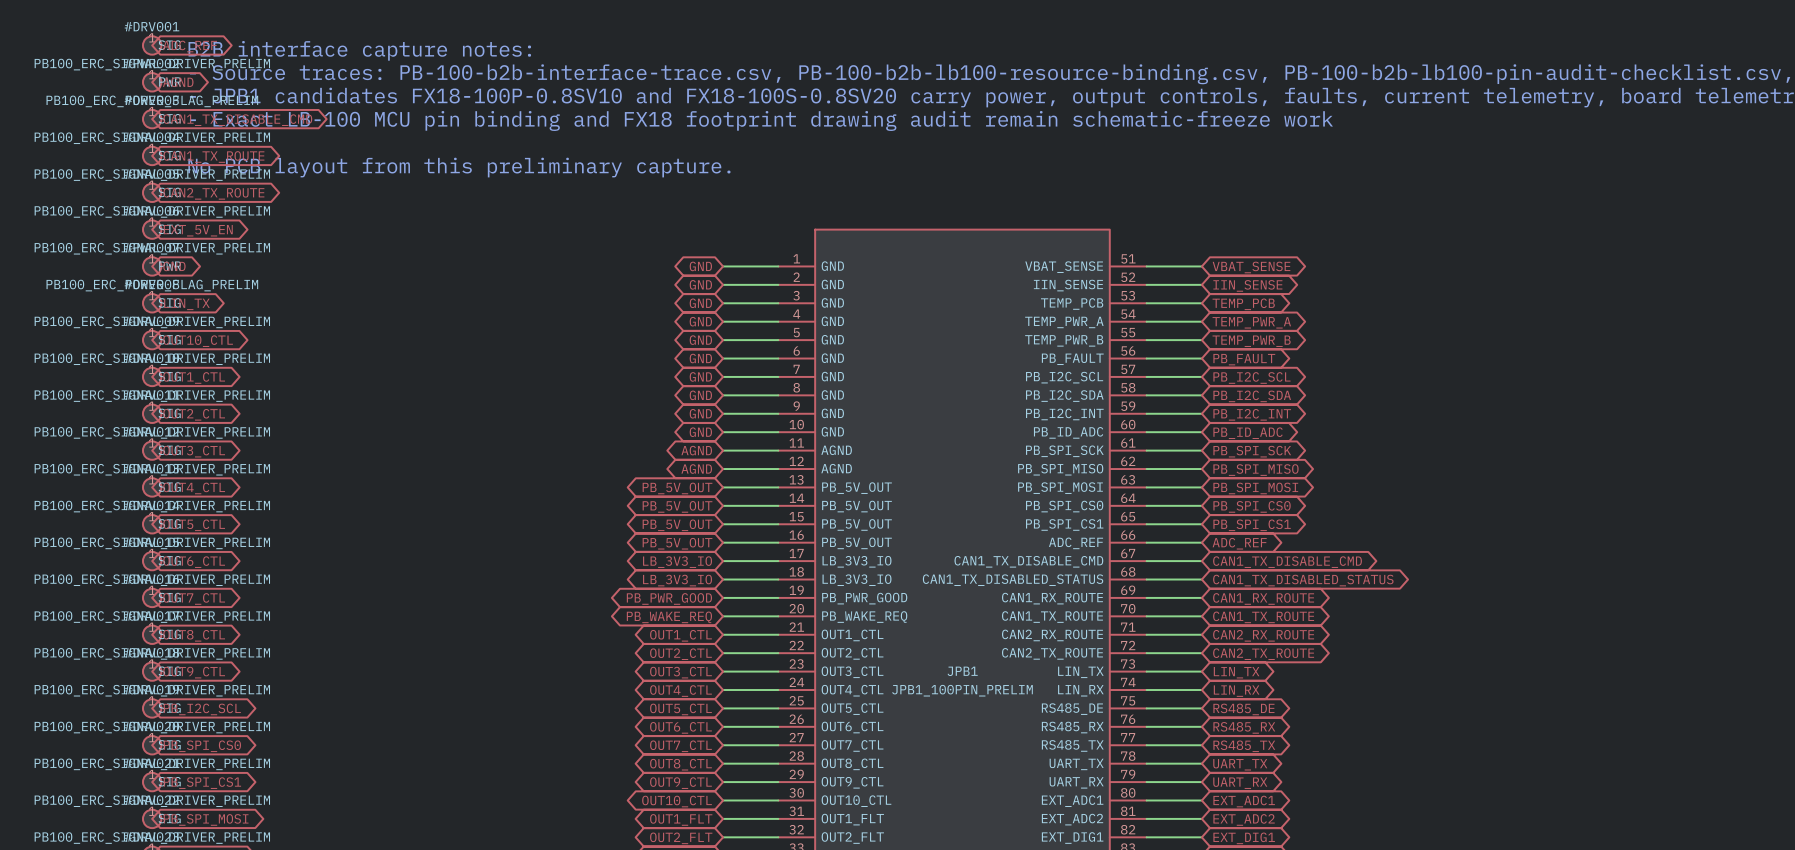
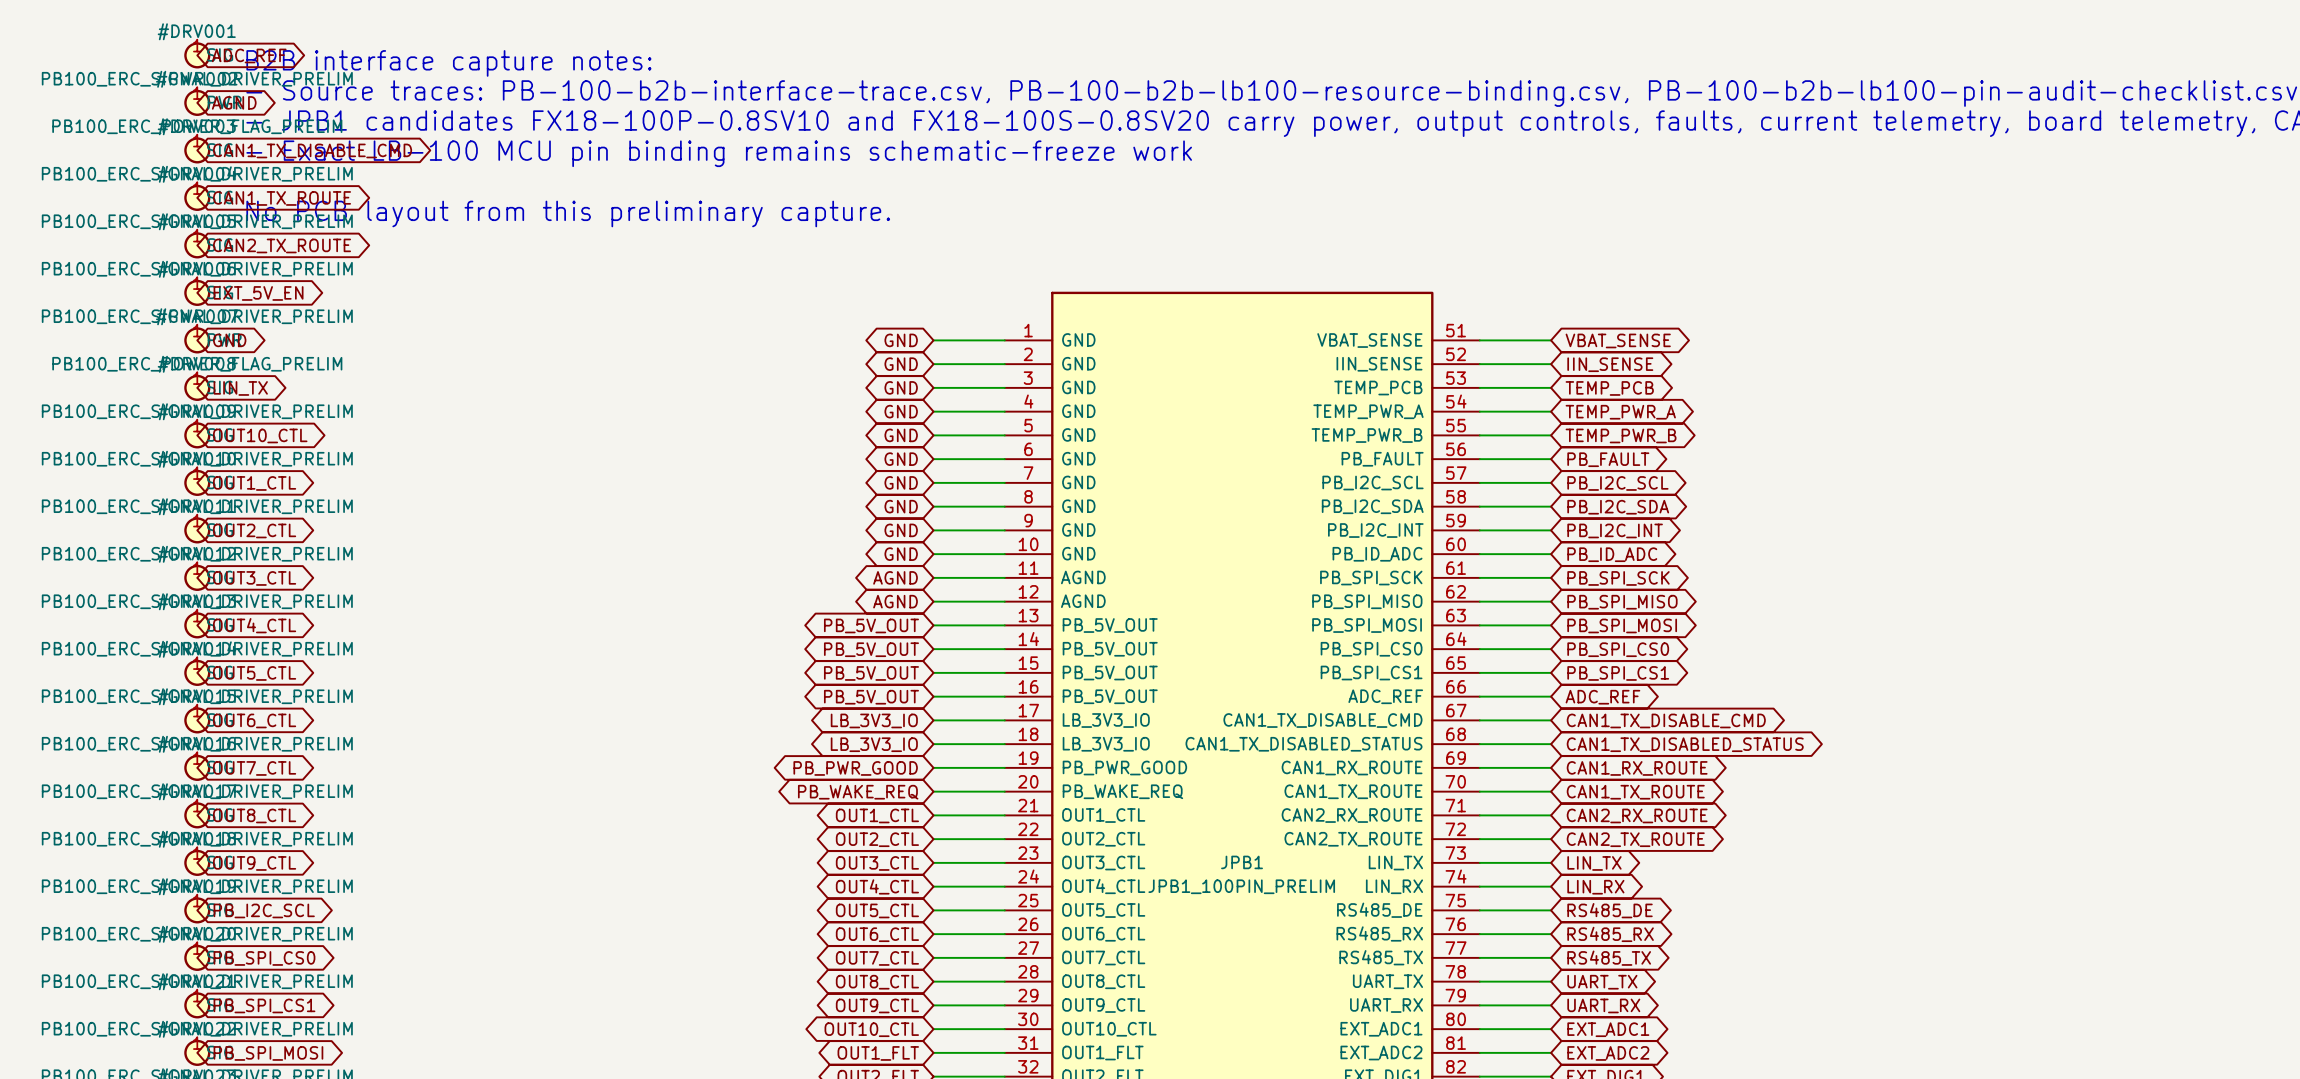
text: - Exact LB-100 MCU pin binding and FX18 footprint drawing audit remain schematic-freeze work (761, 120) -> - Exact LB-100 MCU pin binding remains schematic-freeze work (719, 153)

